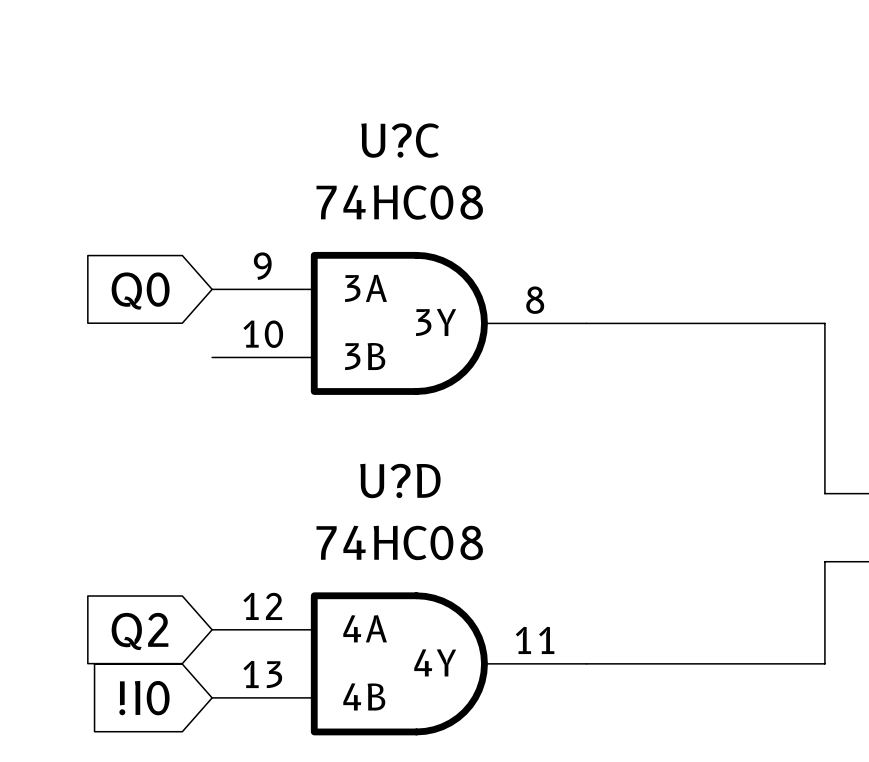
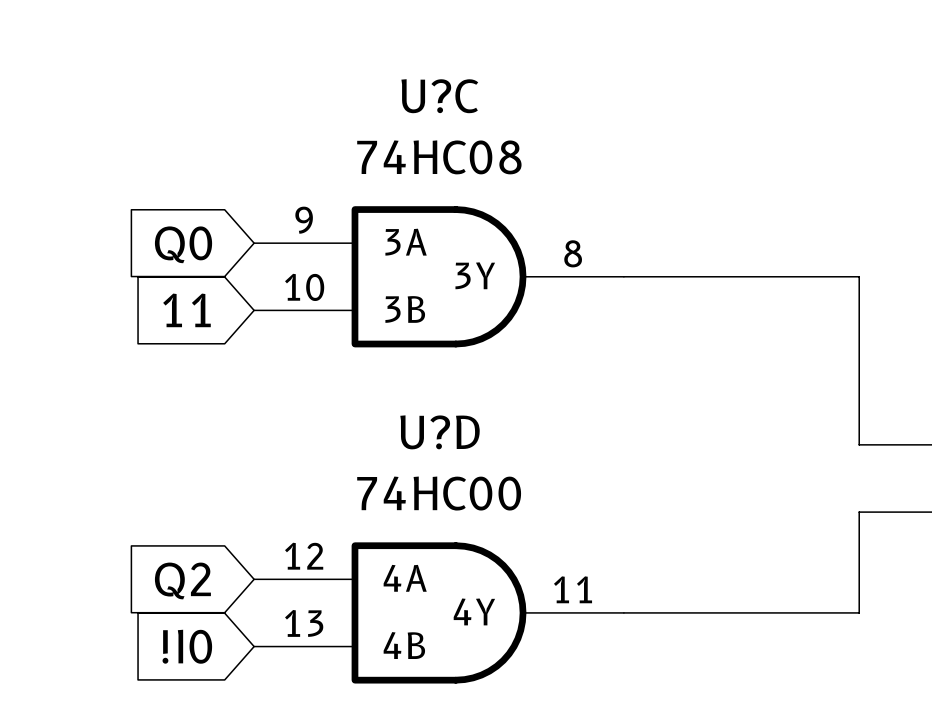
global label: none -> 11 (186, 310)
U?D value: 74HC08 (399, 542) -> 74HC00 (439, 493)

